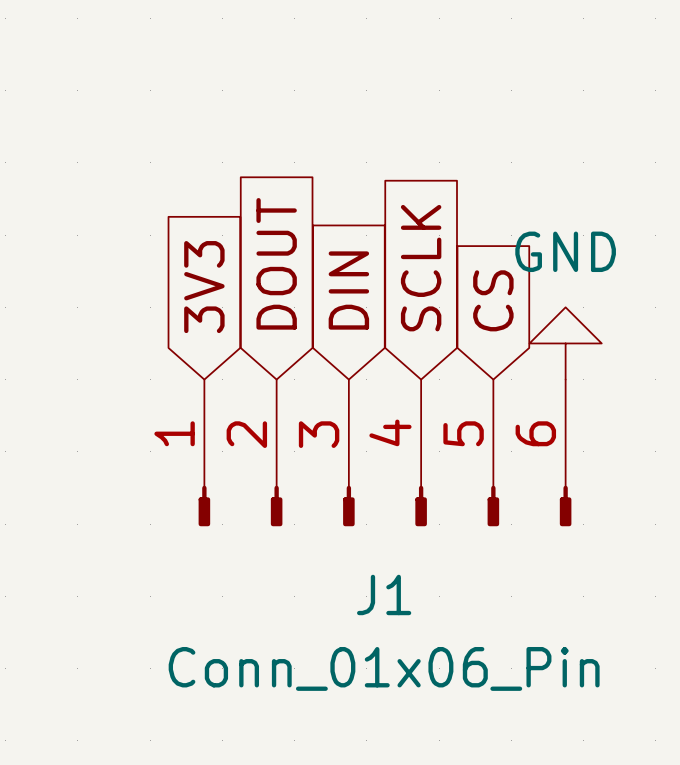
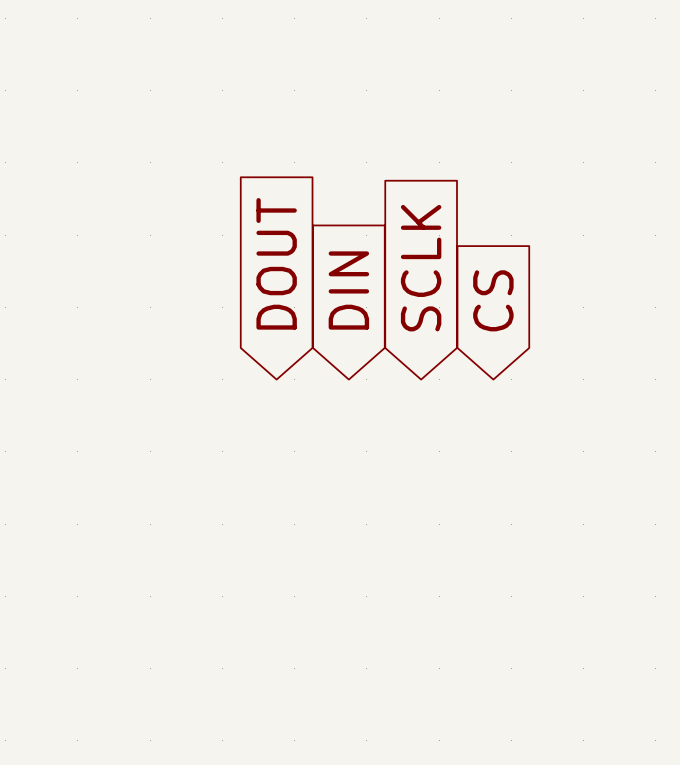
global label: 3V3 (204, 287) -> none
power symbol: GND (565, 343) -> none
J1: Conn_01x06_Pin (385, 452) -> none

